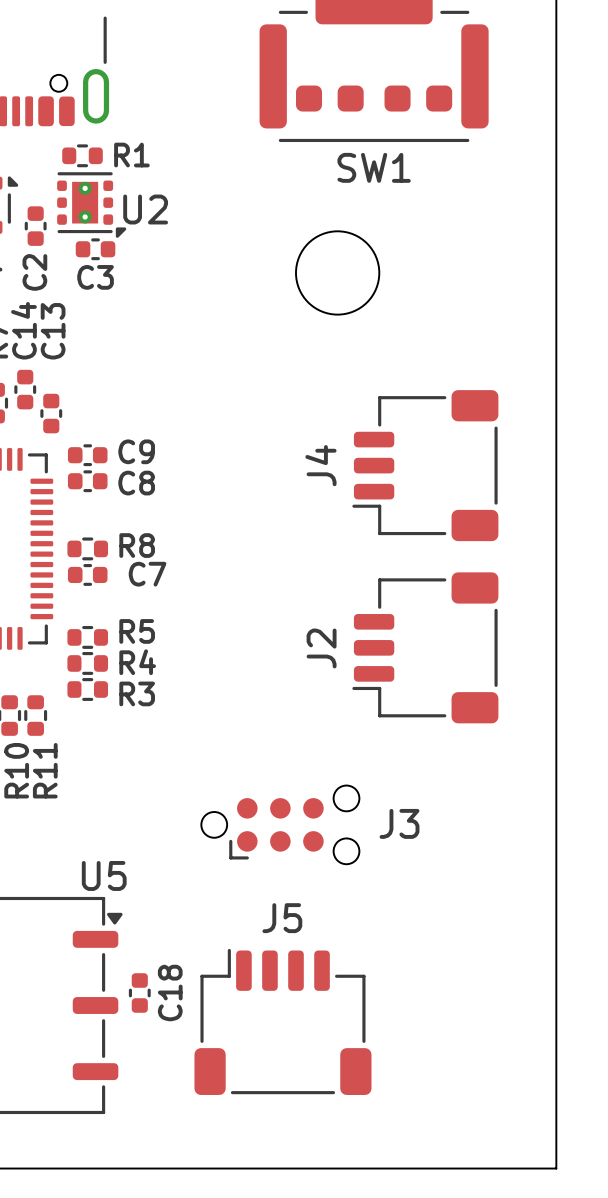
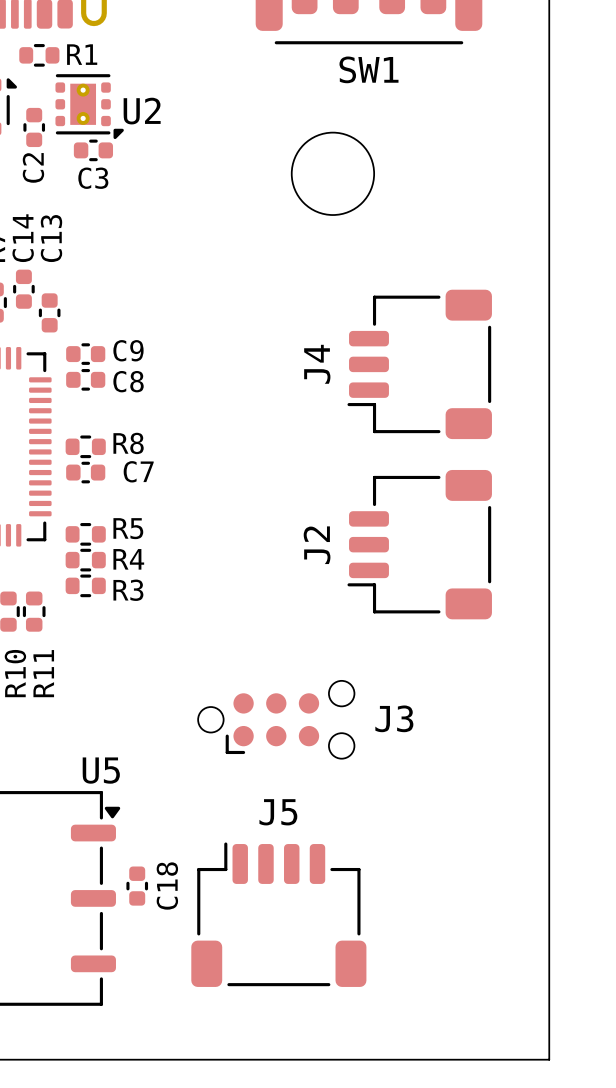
R1 position: (82, 155) -> (39, 55)

